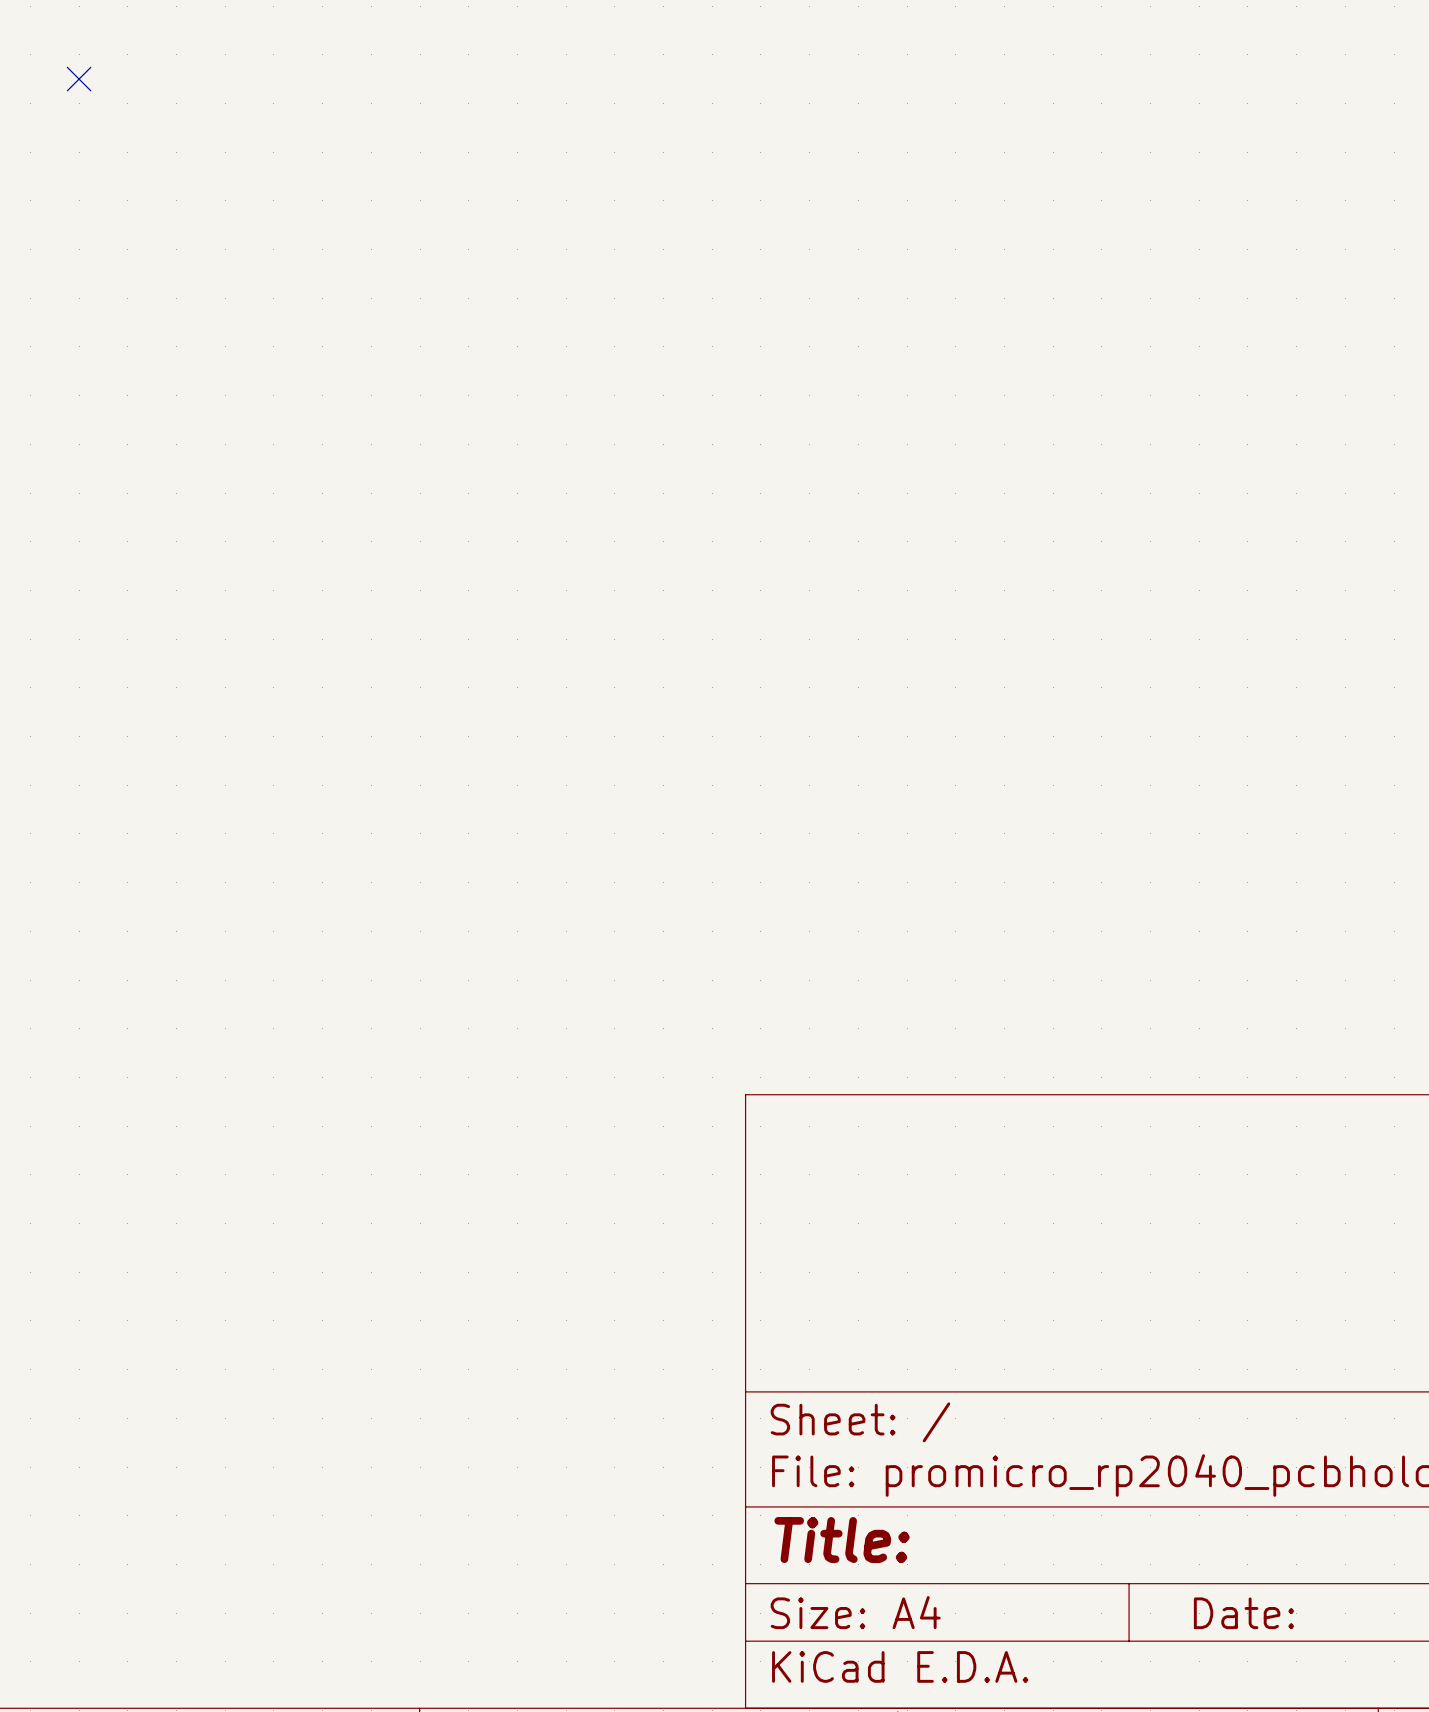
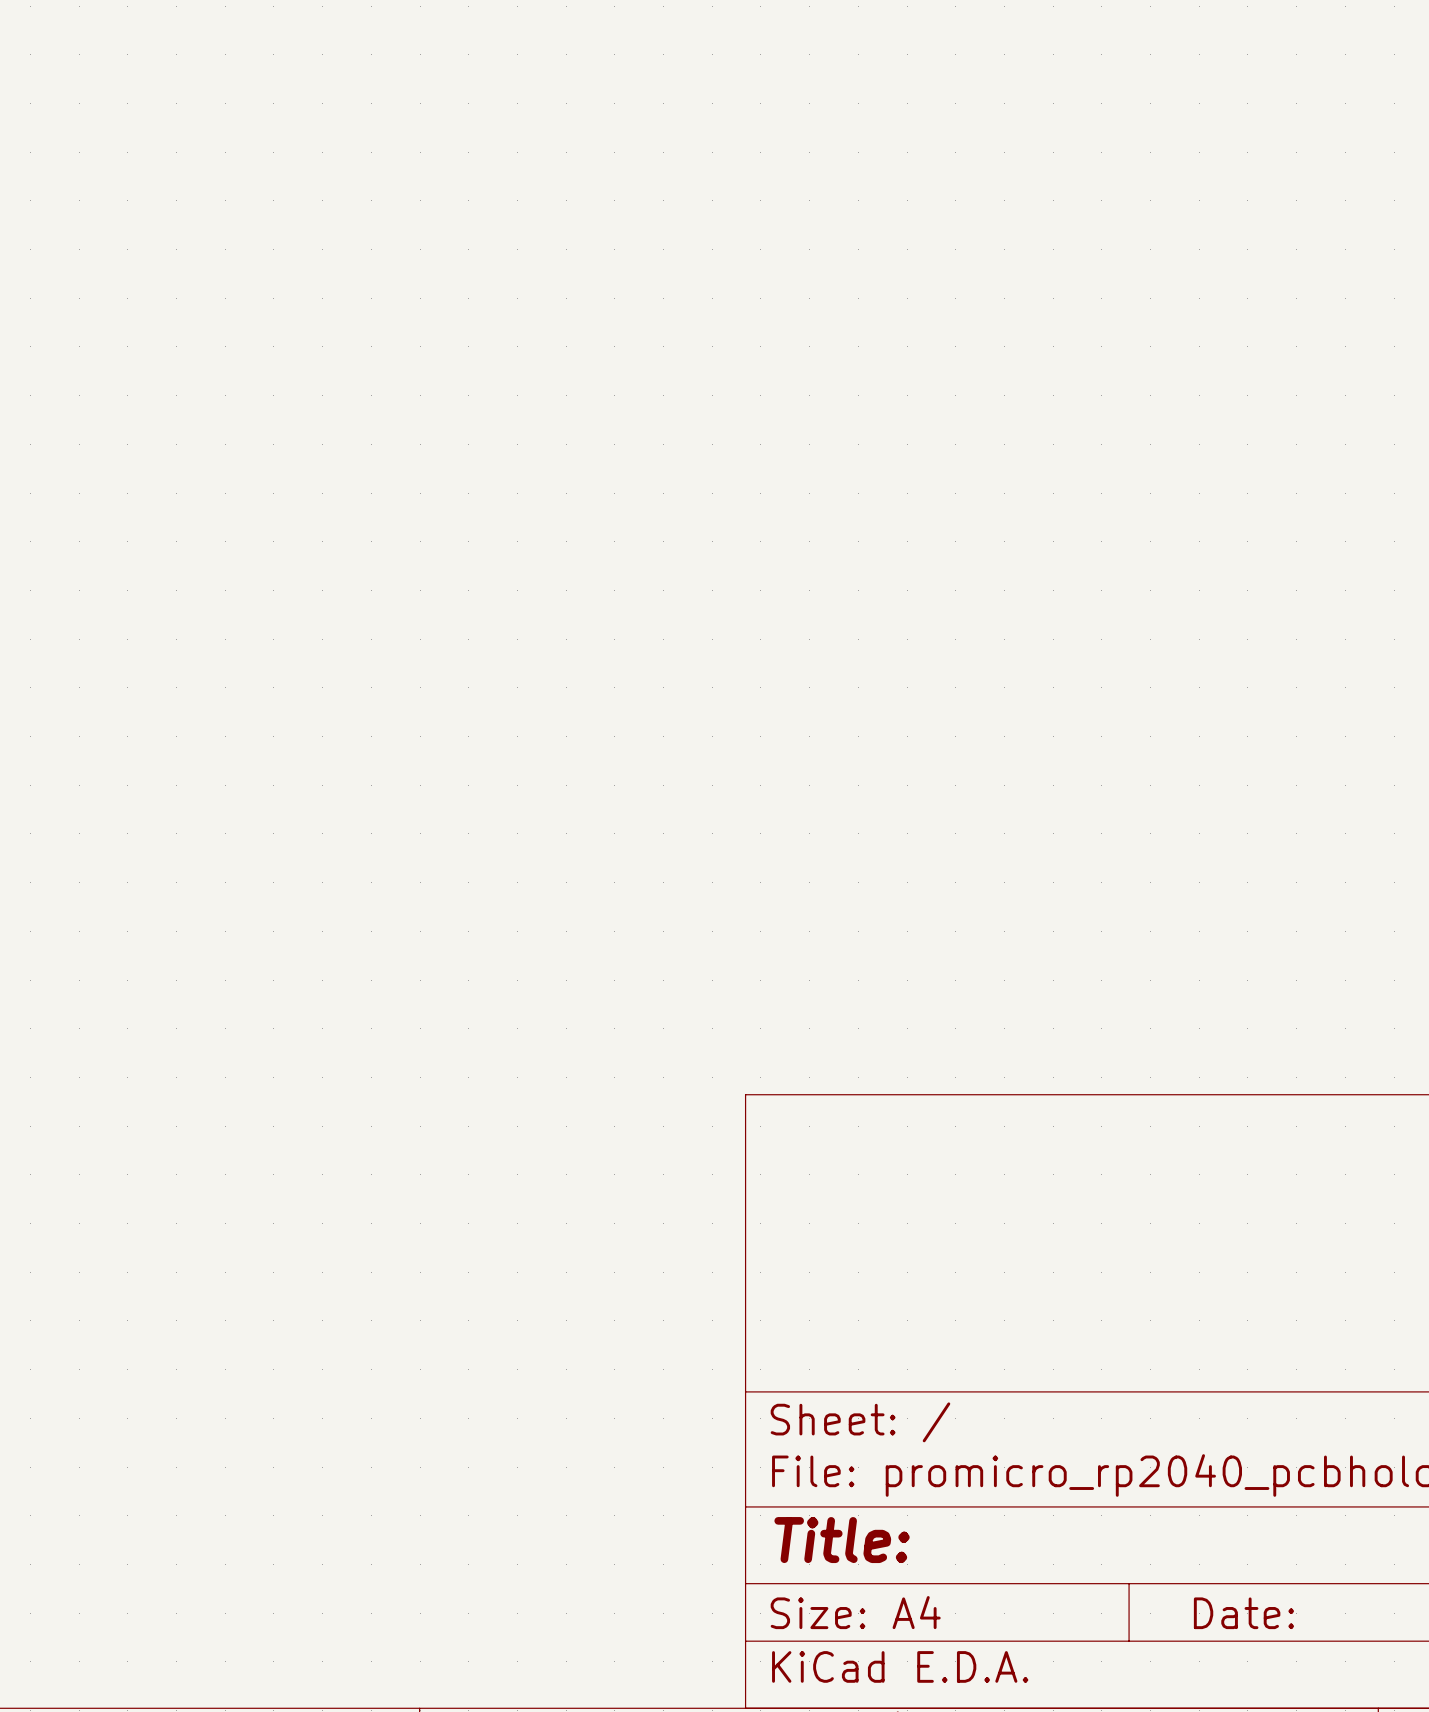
no-connect mark: (79, 79) -> none

